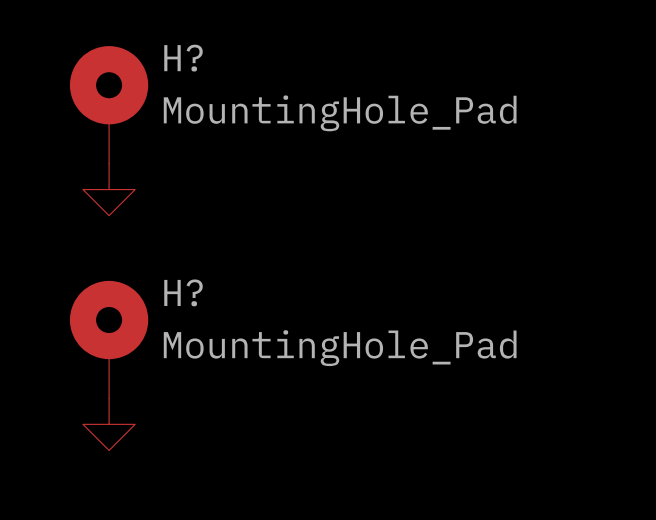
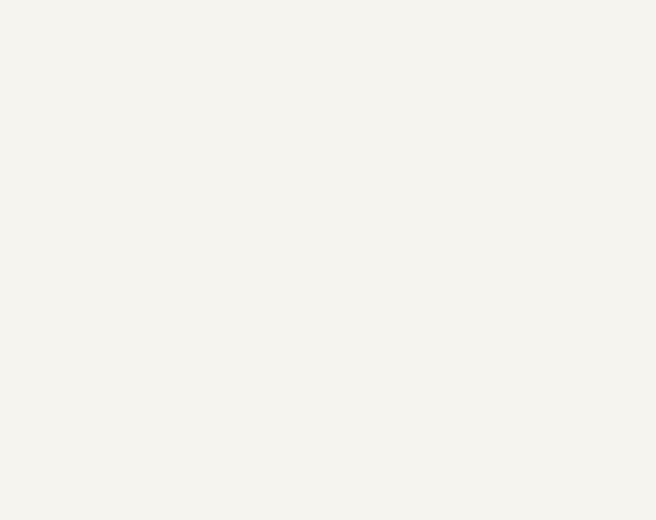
H?: MountingHole_Pad (109, 104) -> none
power symbol: (109, 189) -> none
H?: MountingHole_Pad (109, 339) -> none
power symbol: (109, 424) -> none

